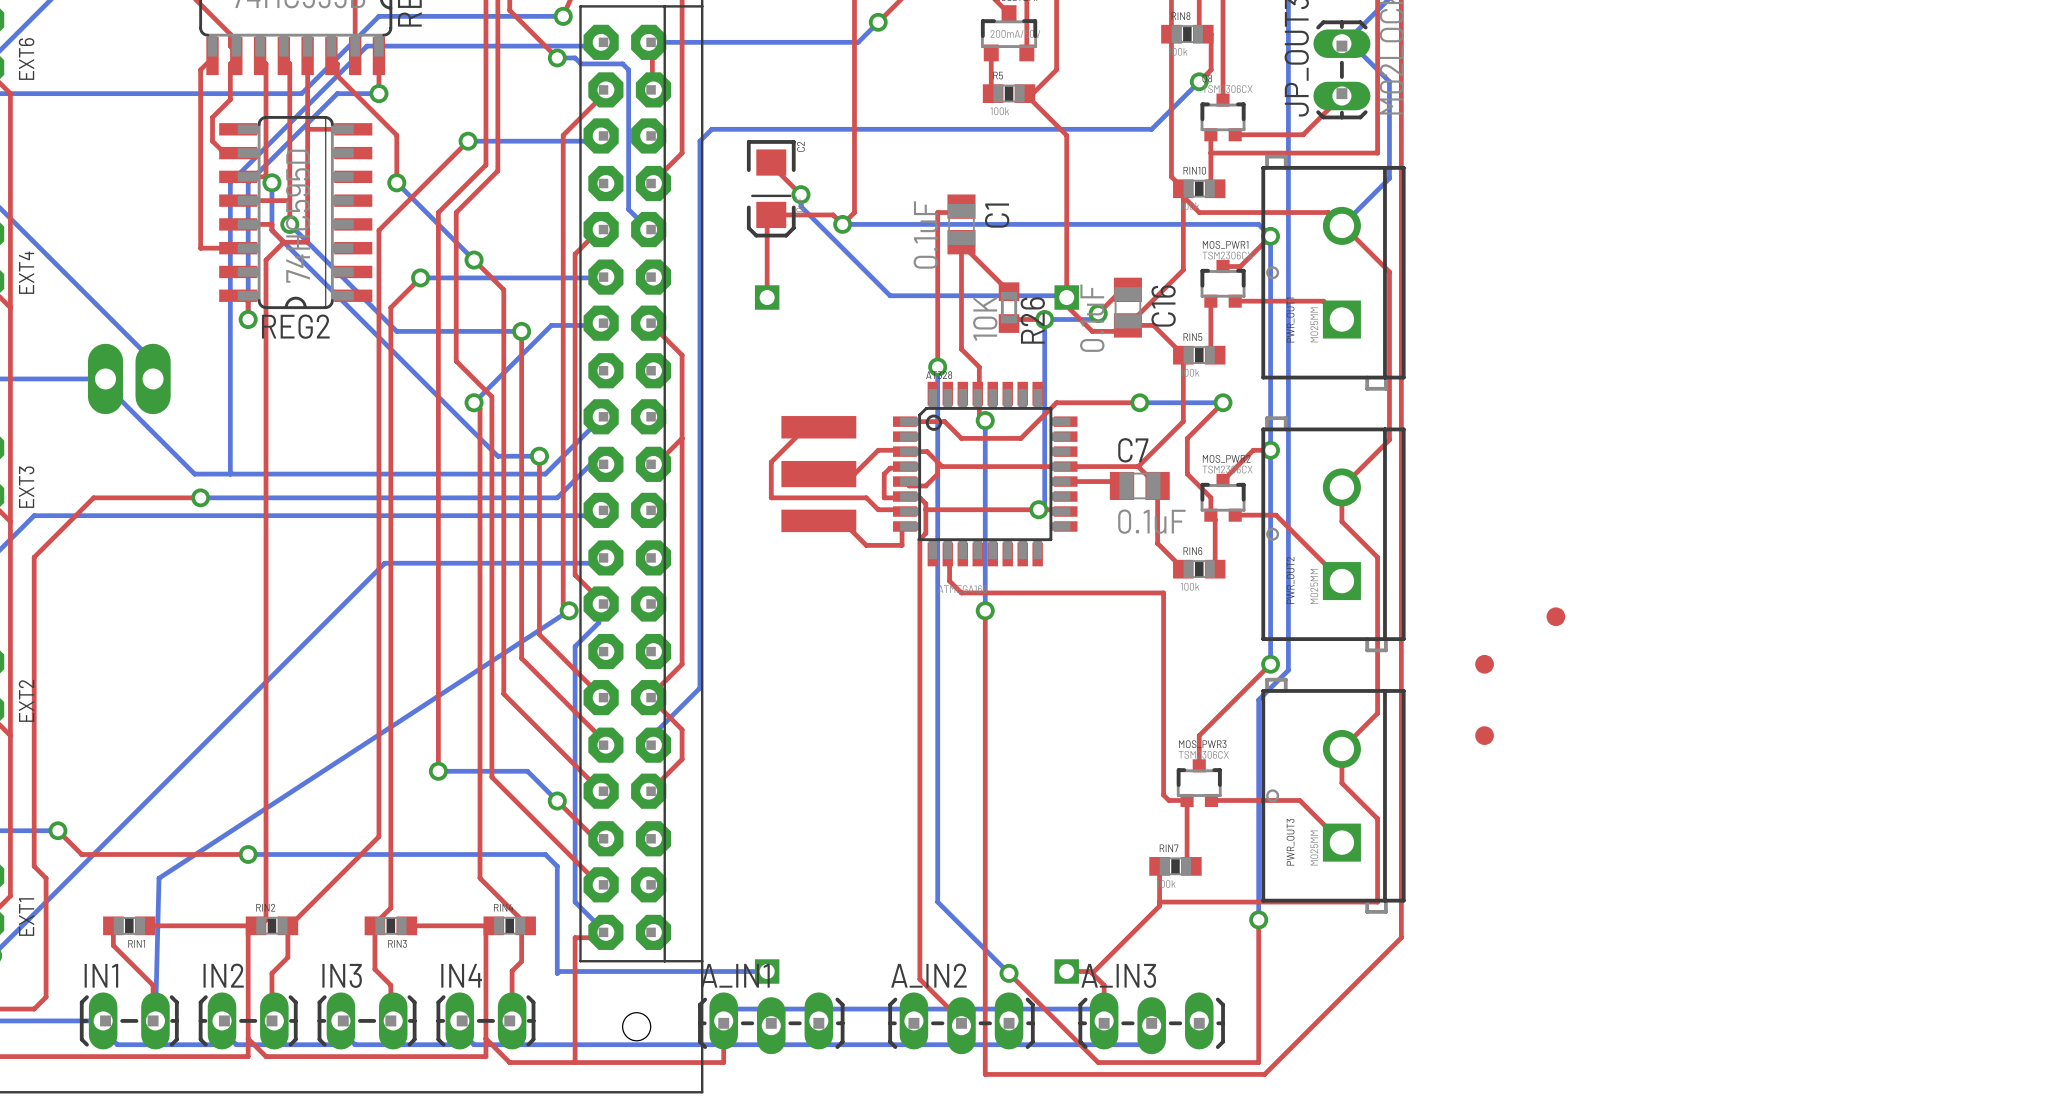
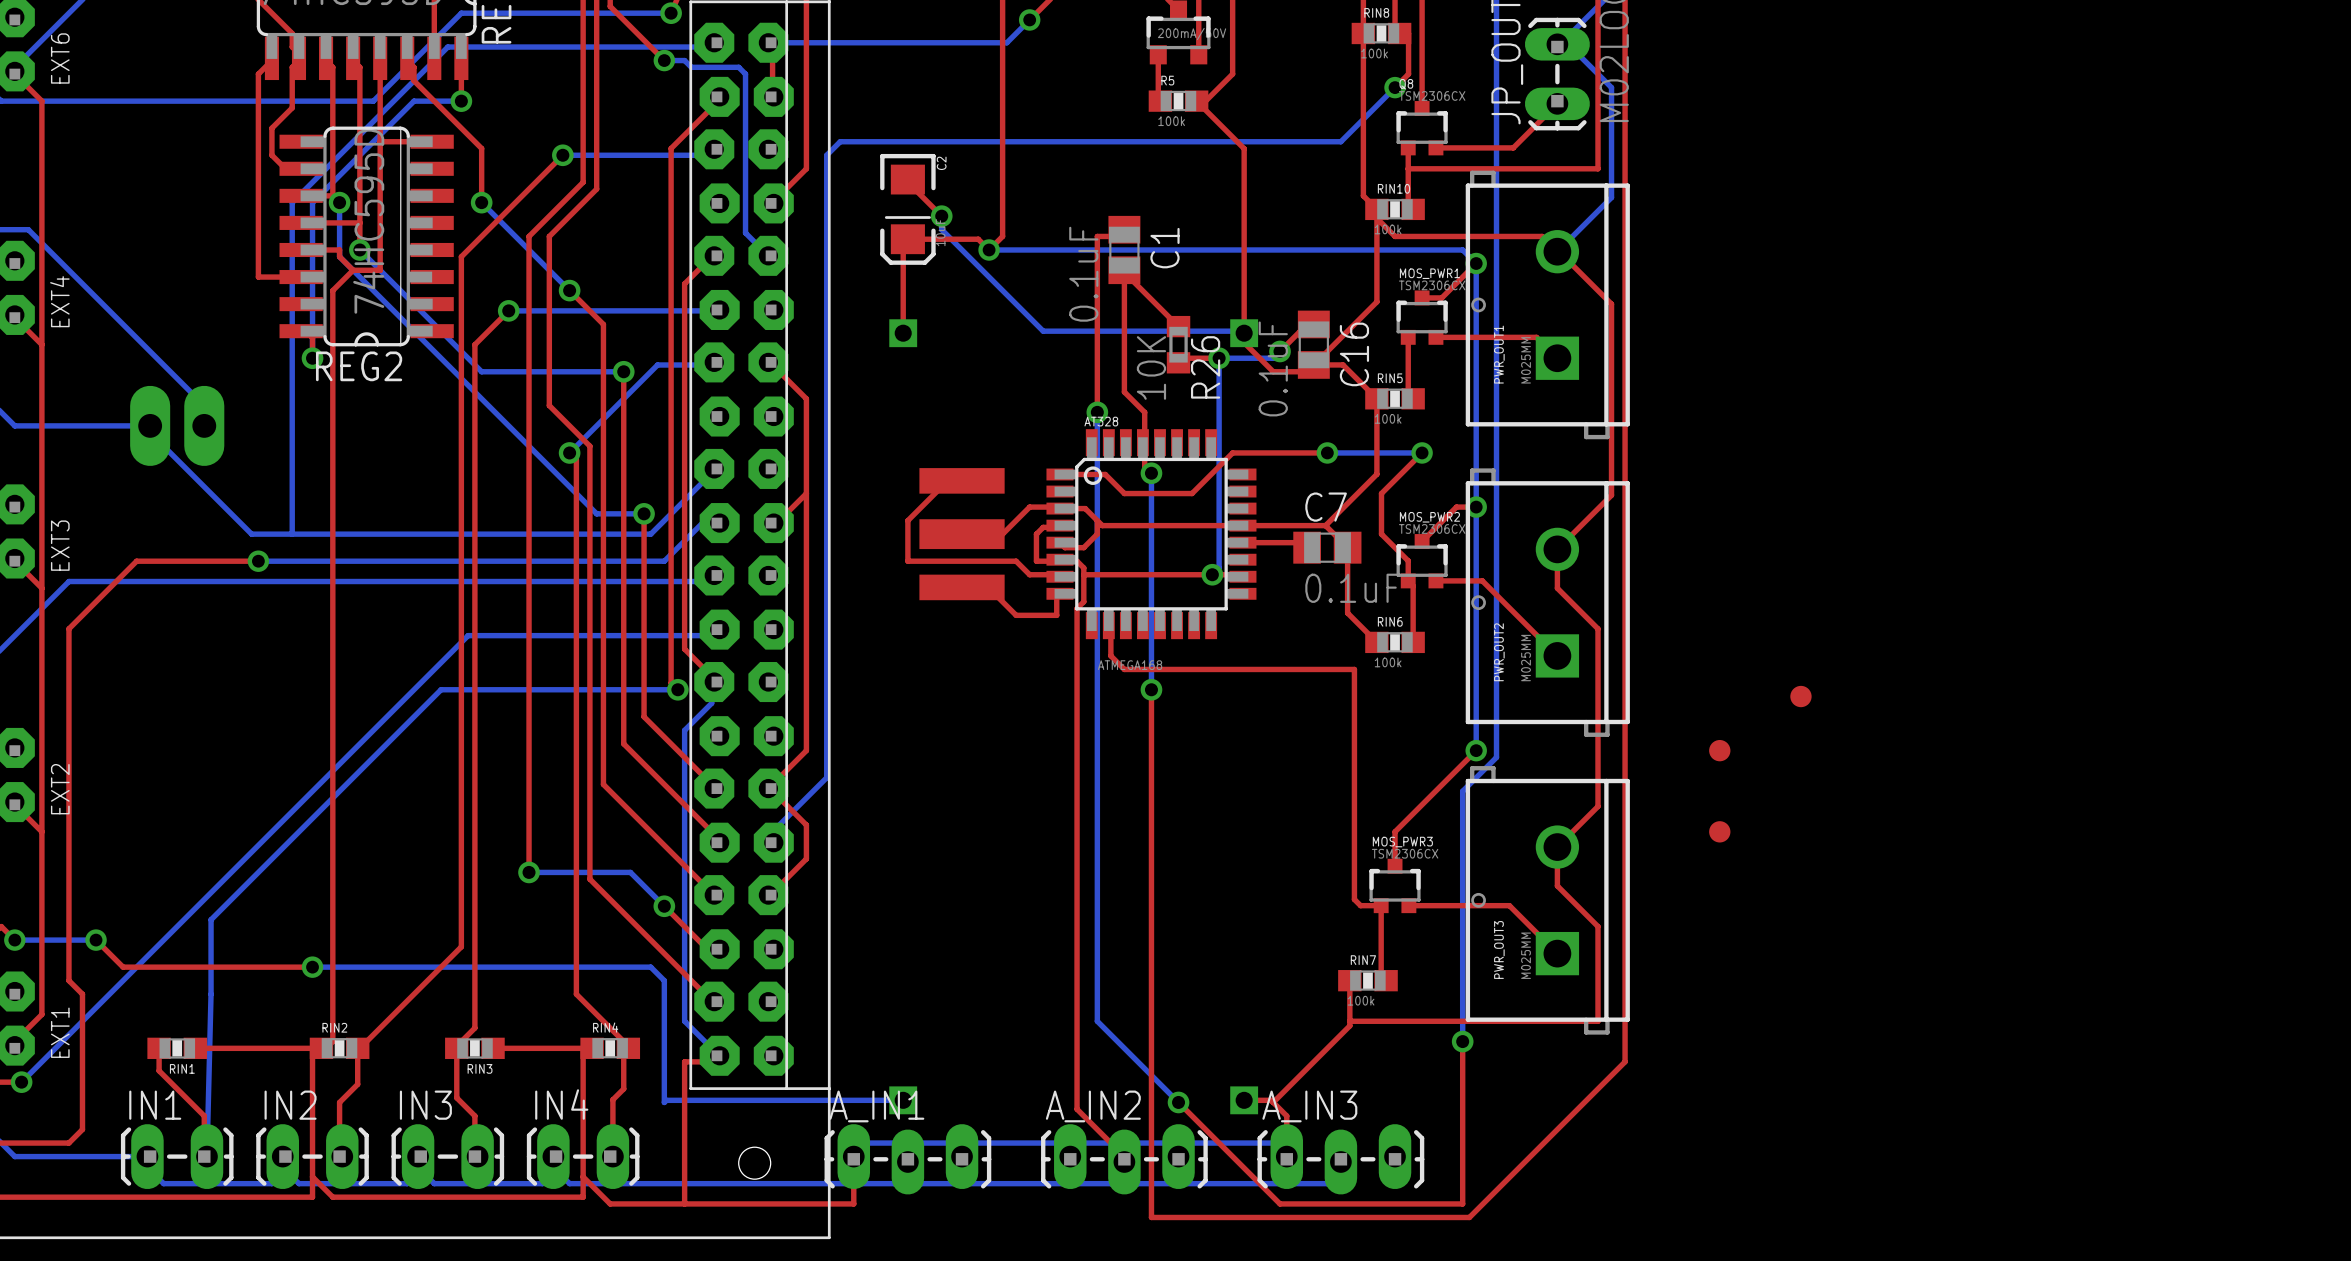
bottom track: (569, 610) (159, 878) -> (677, 689) (441, 689) (211, 919) (211, 994)

